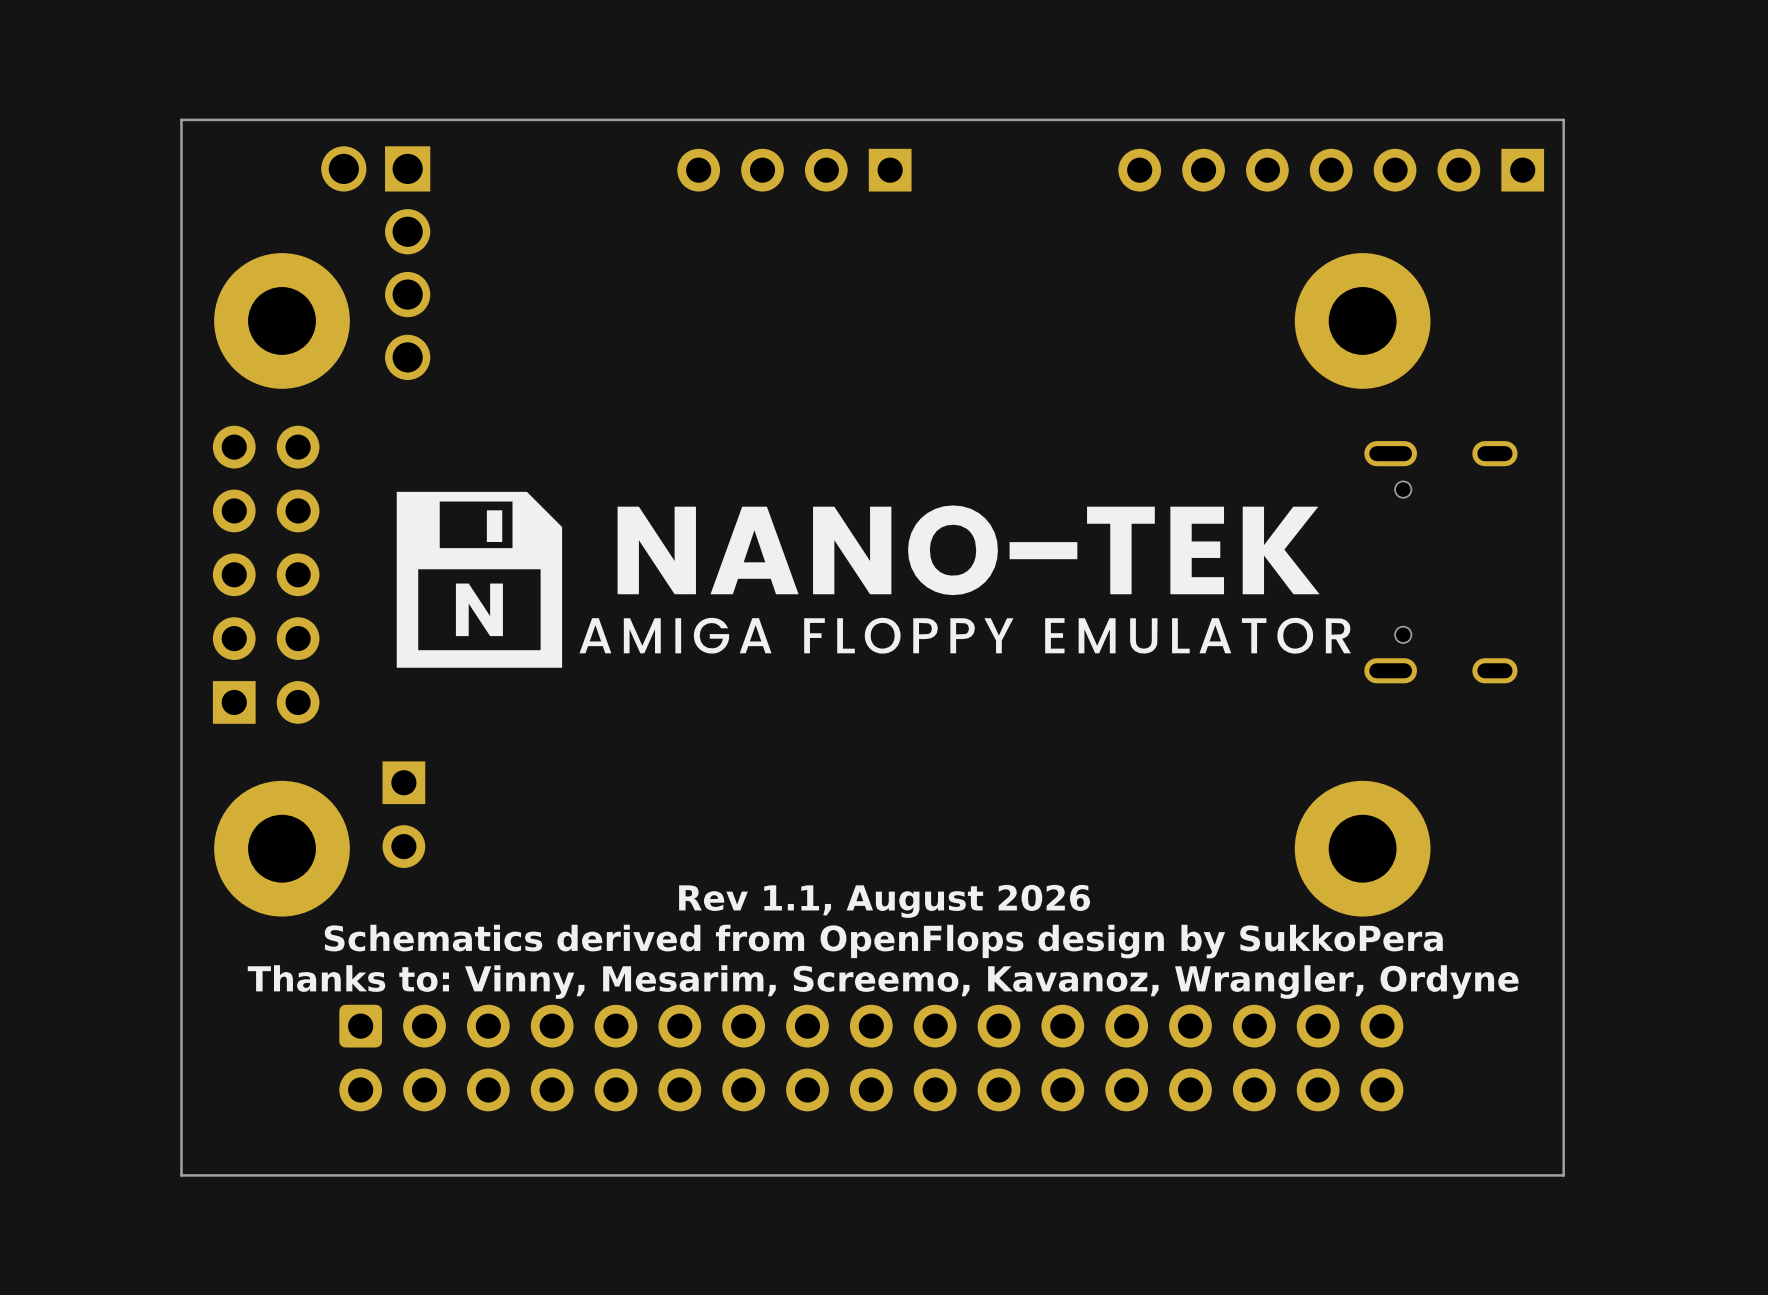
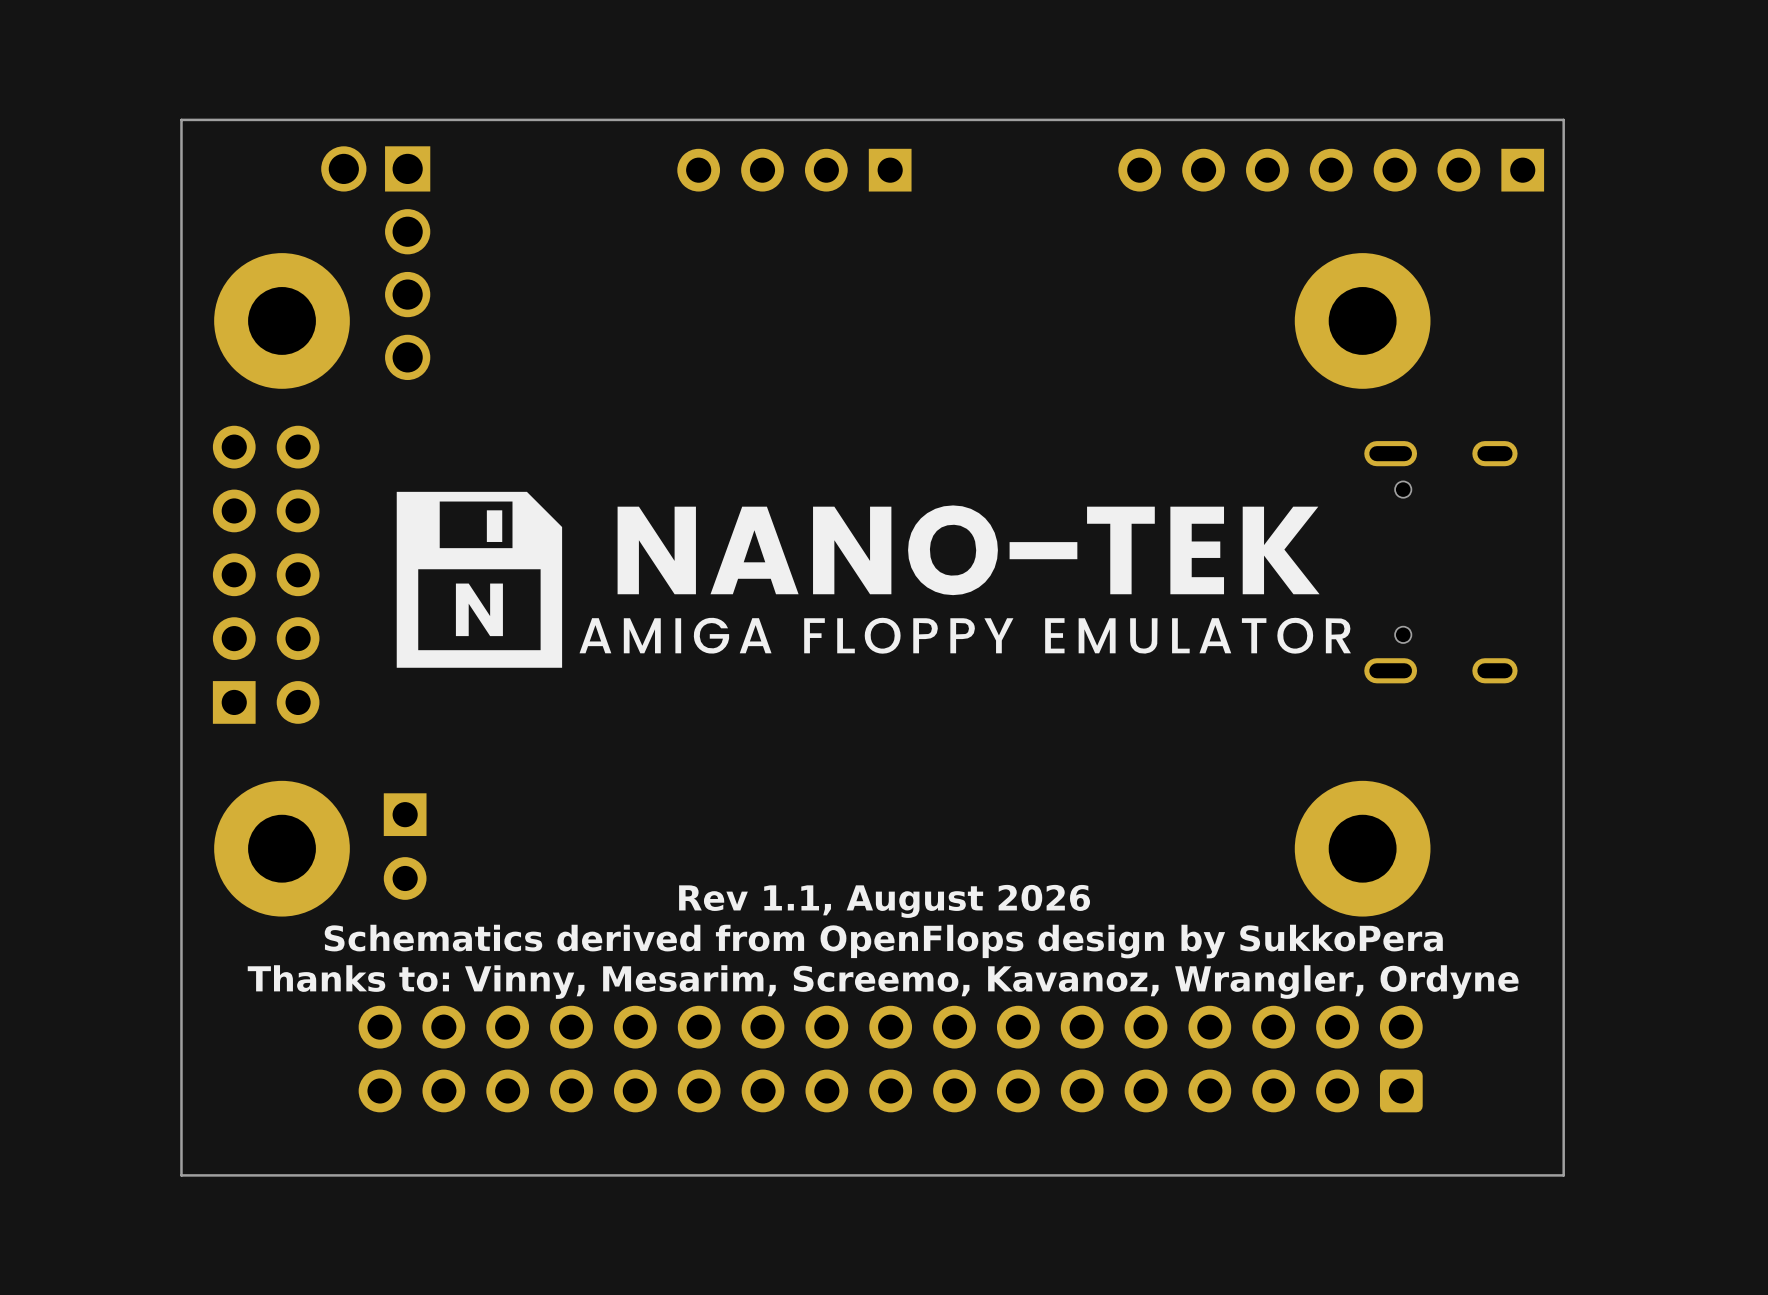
part position: (403, 814) -> (405, 846)
part rotation: 0° (871, 1058) -> 180° (890, 1059)

